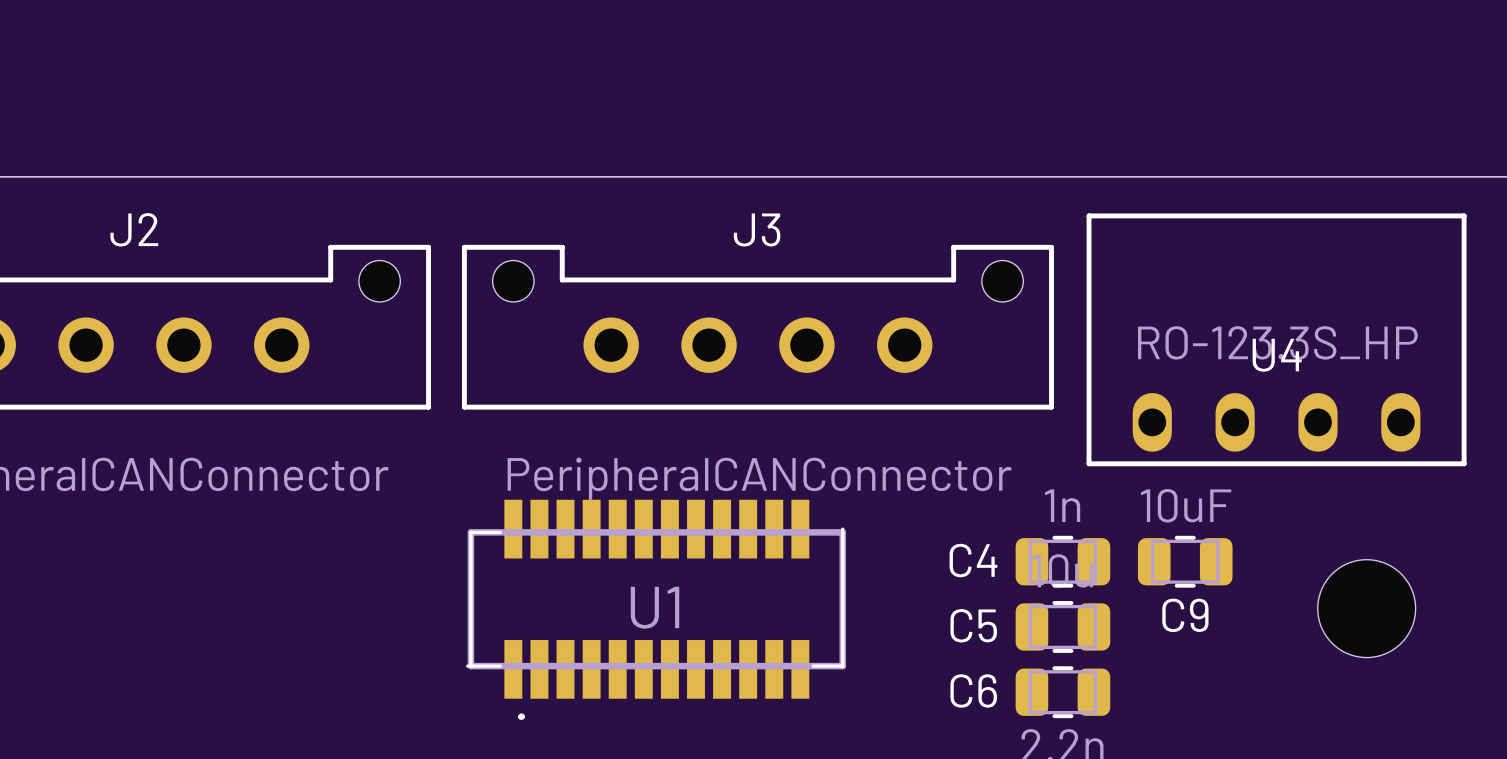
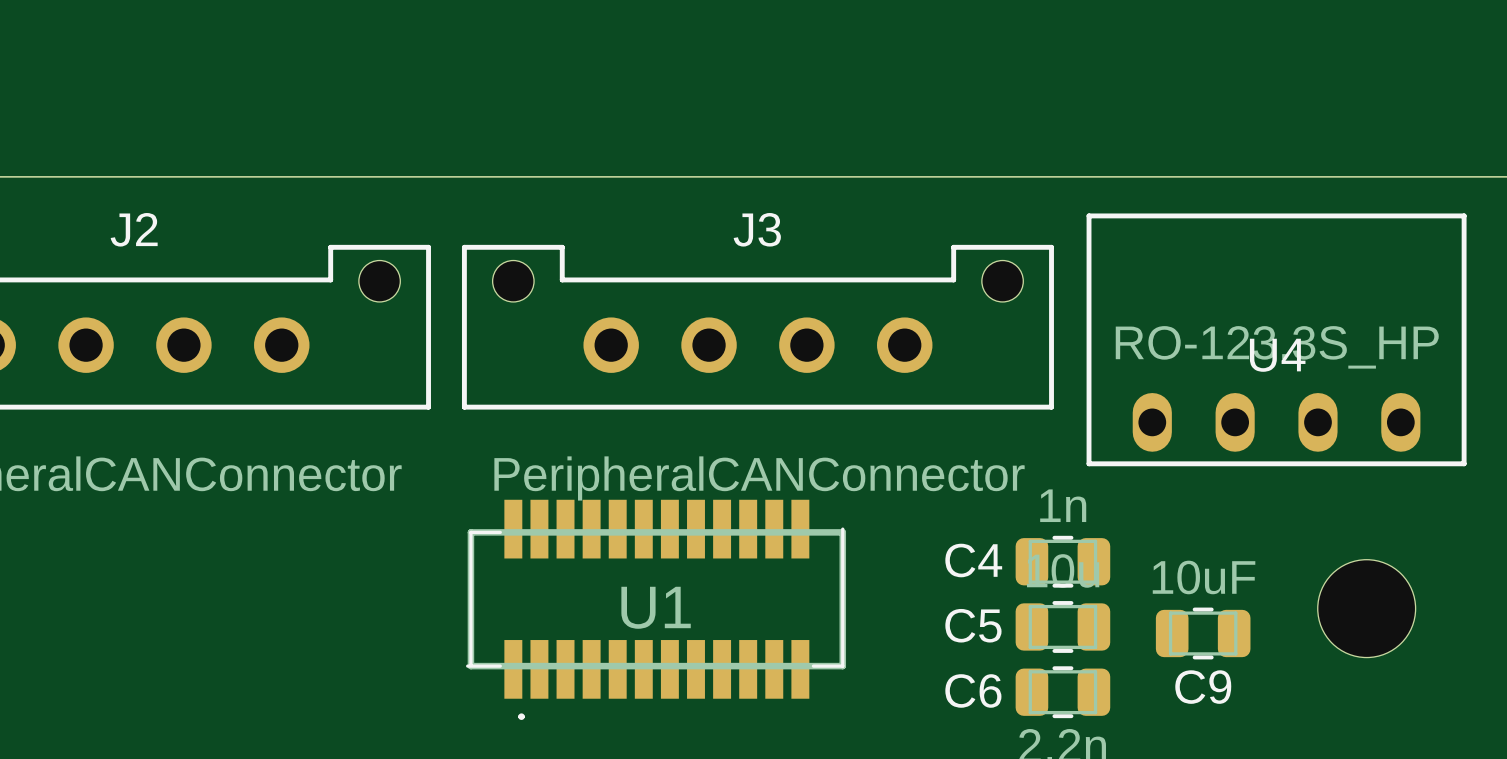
C9 position: (1185, 561) -> (1203, 633)

